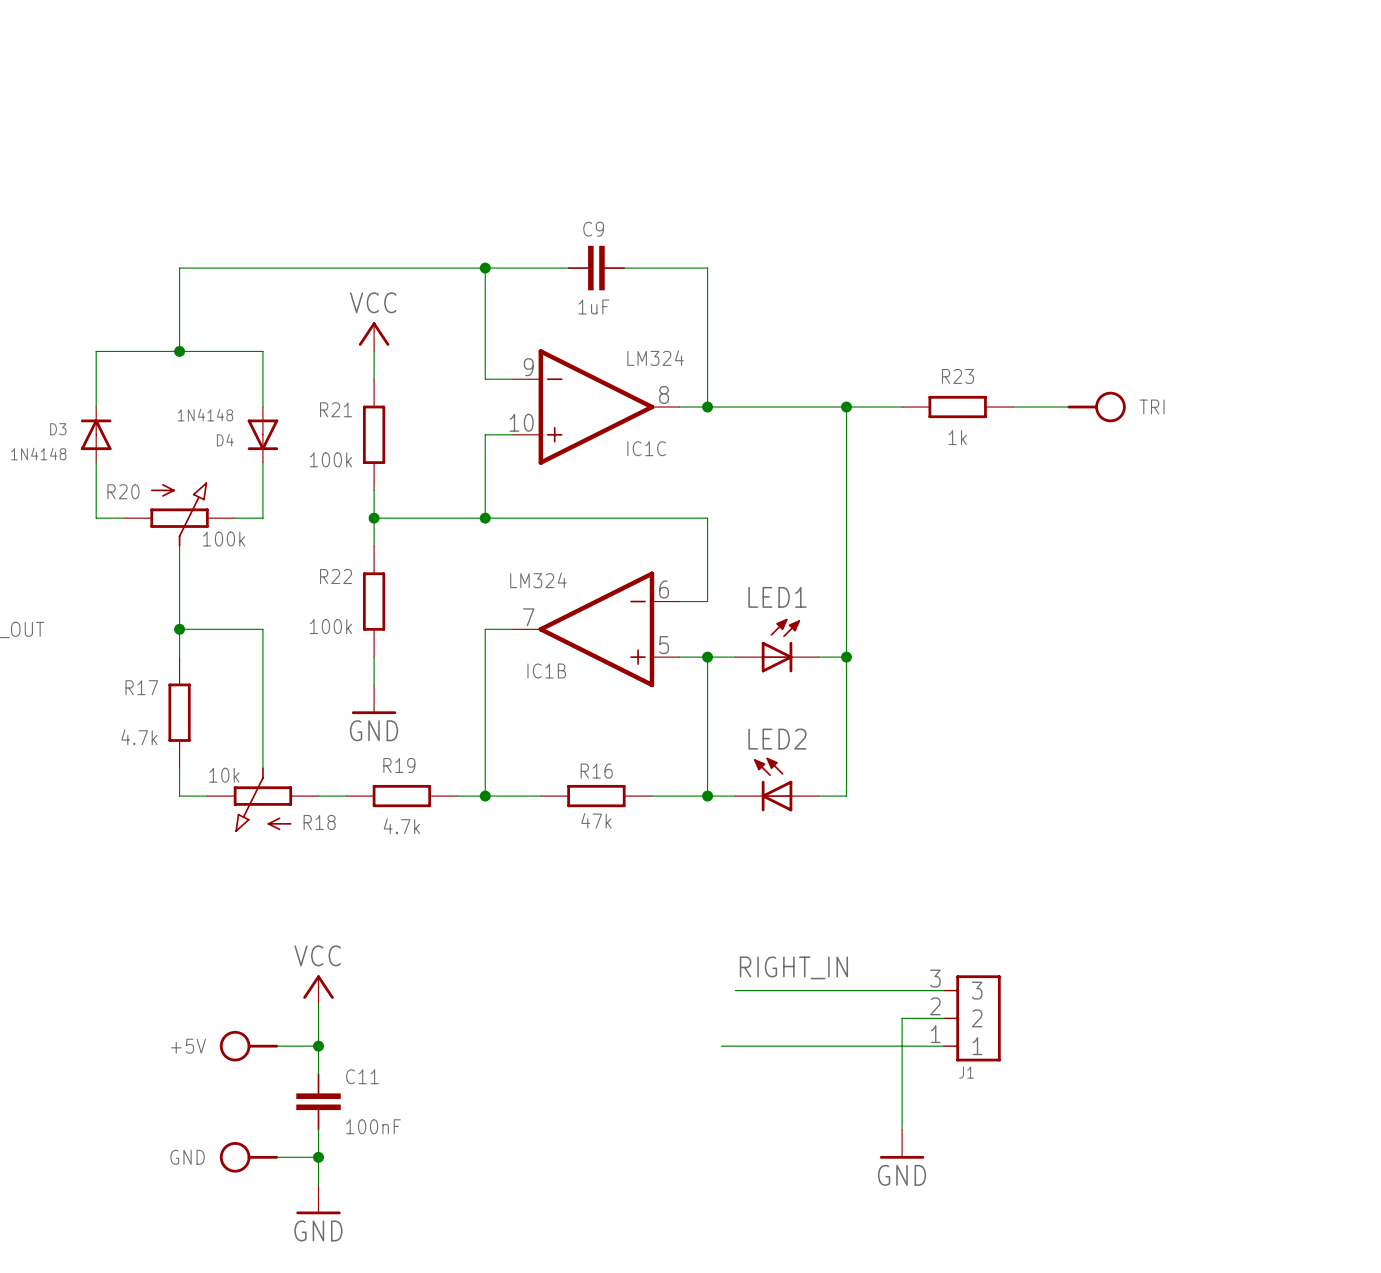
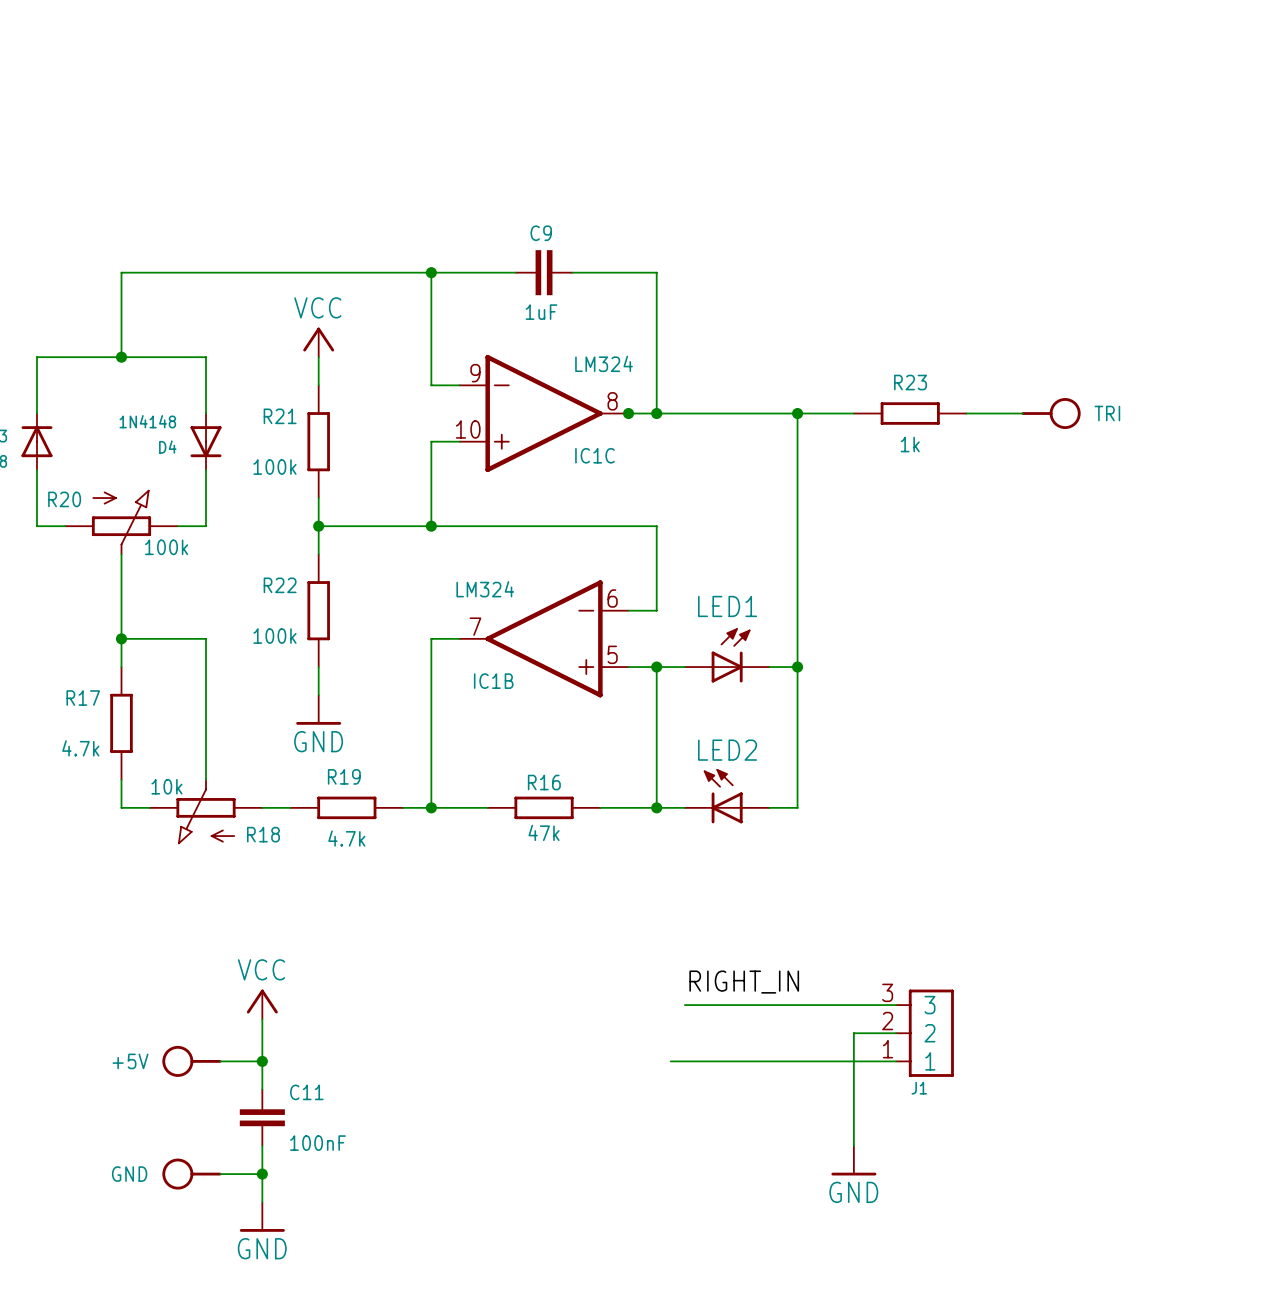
junction: none -> (628, 413)

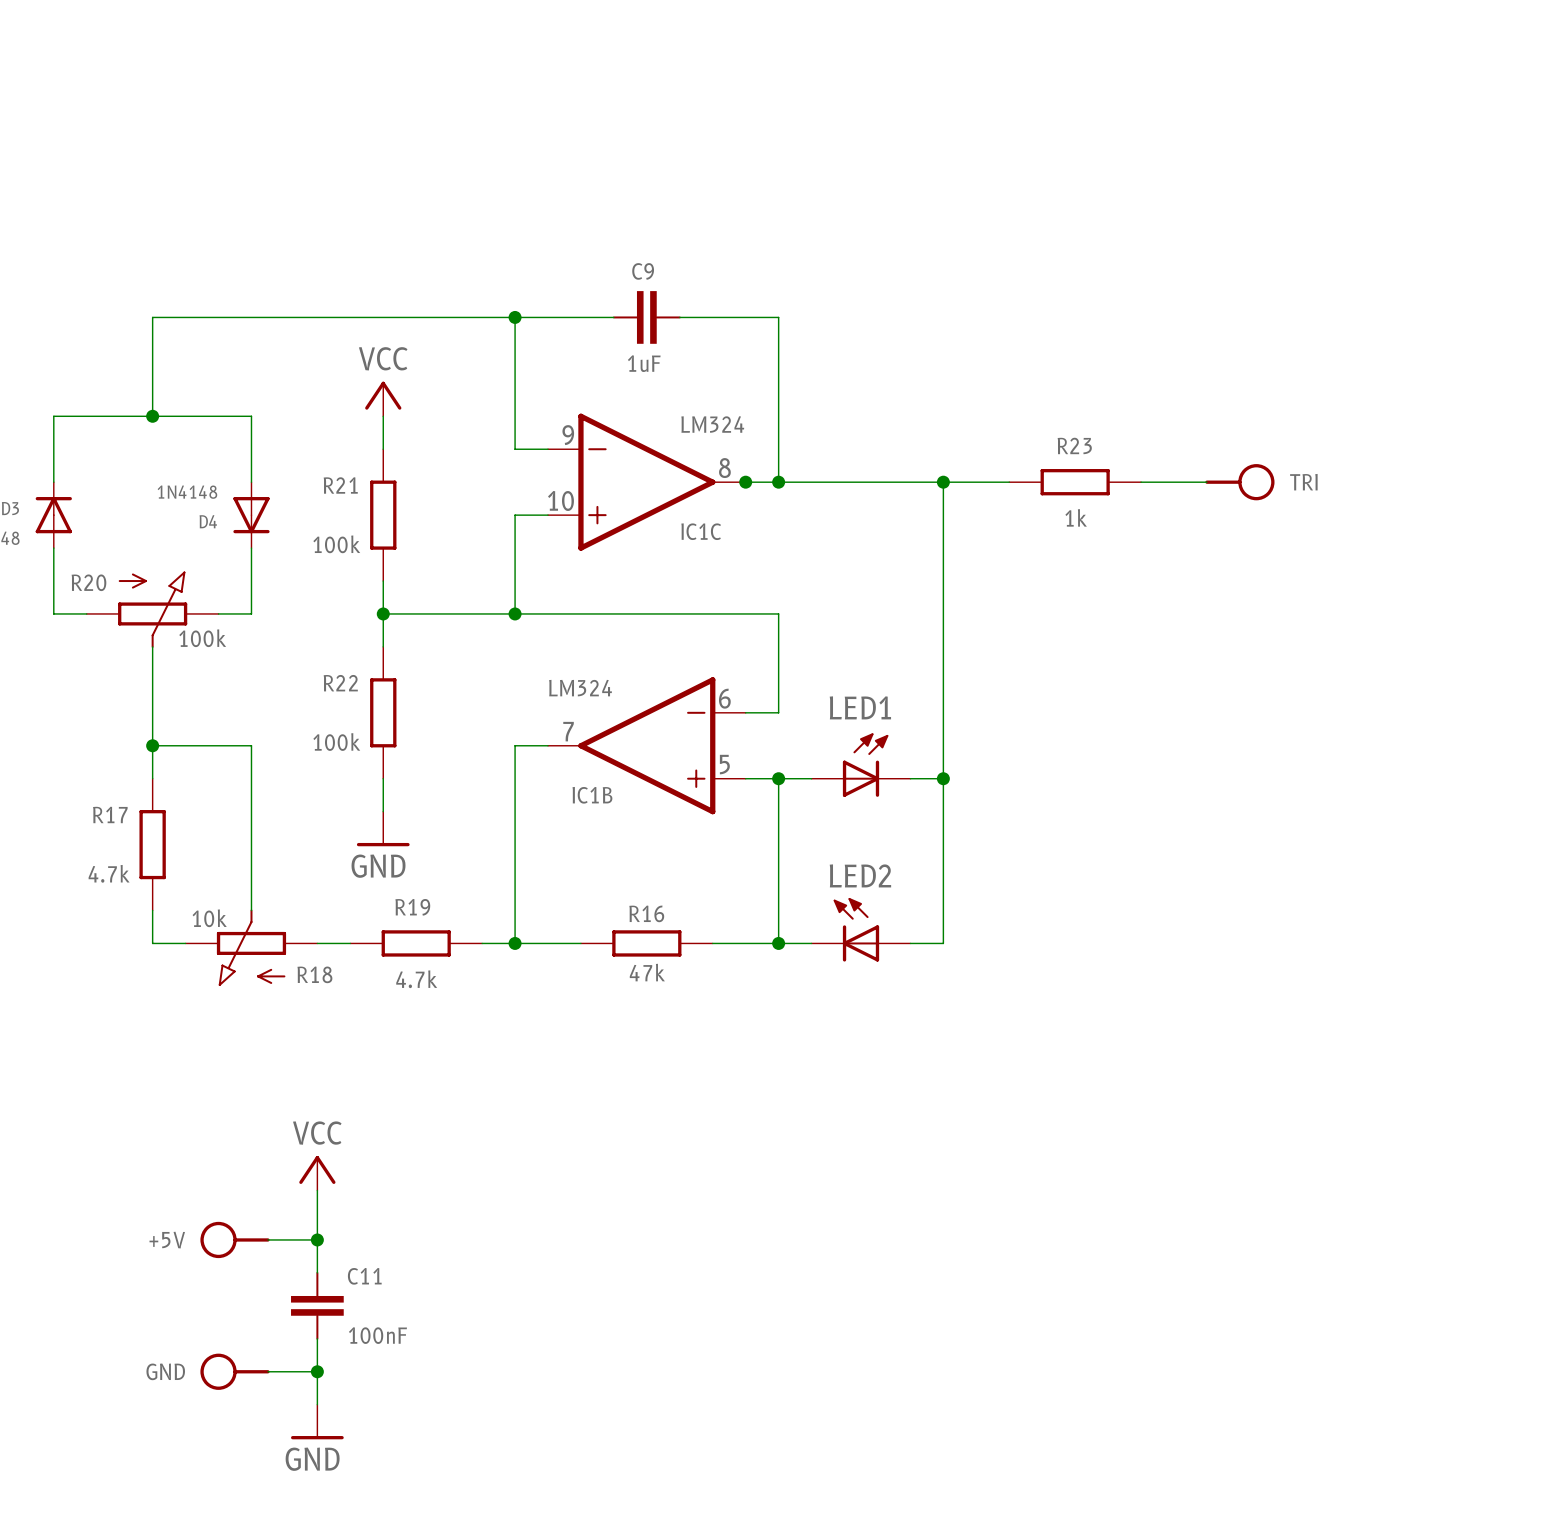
label: RIGHT_IN (744, 982) -> none
wire: (684, 1005) (896, 1005) -> none
wire: (896, 1033) (853, 1033) (853, 1145) -> none
J1: (924, 1033) -> none
wire: (670, 1061) (896, 1061) -> none
power symbol: GND (853, 1160) -> none

